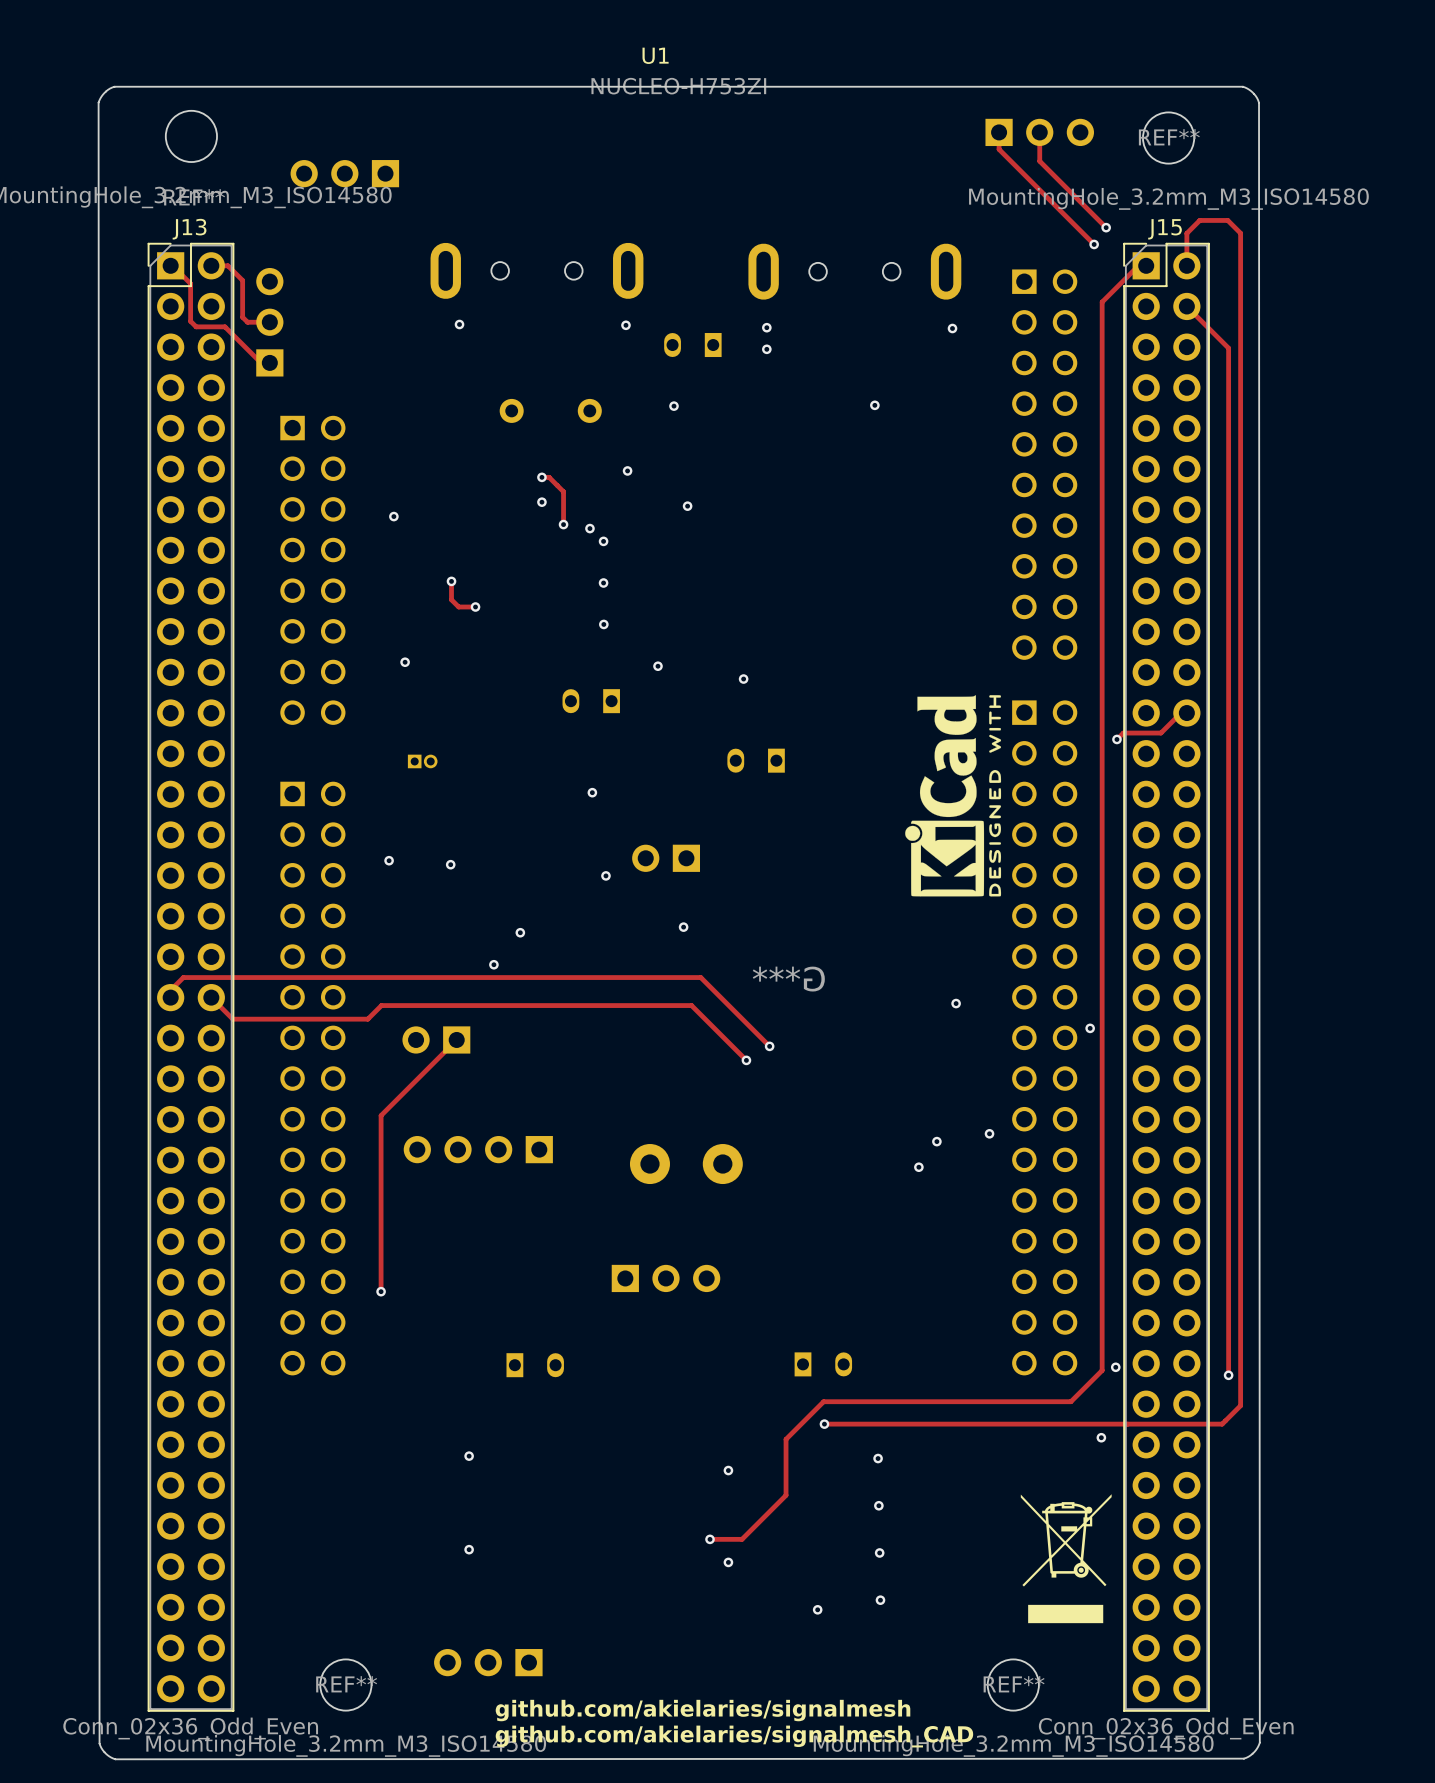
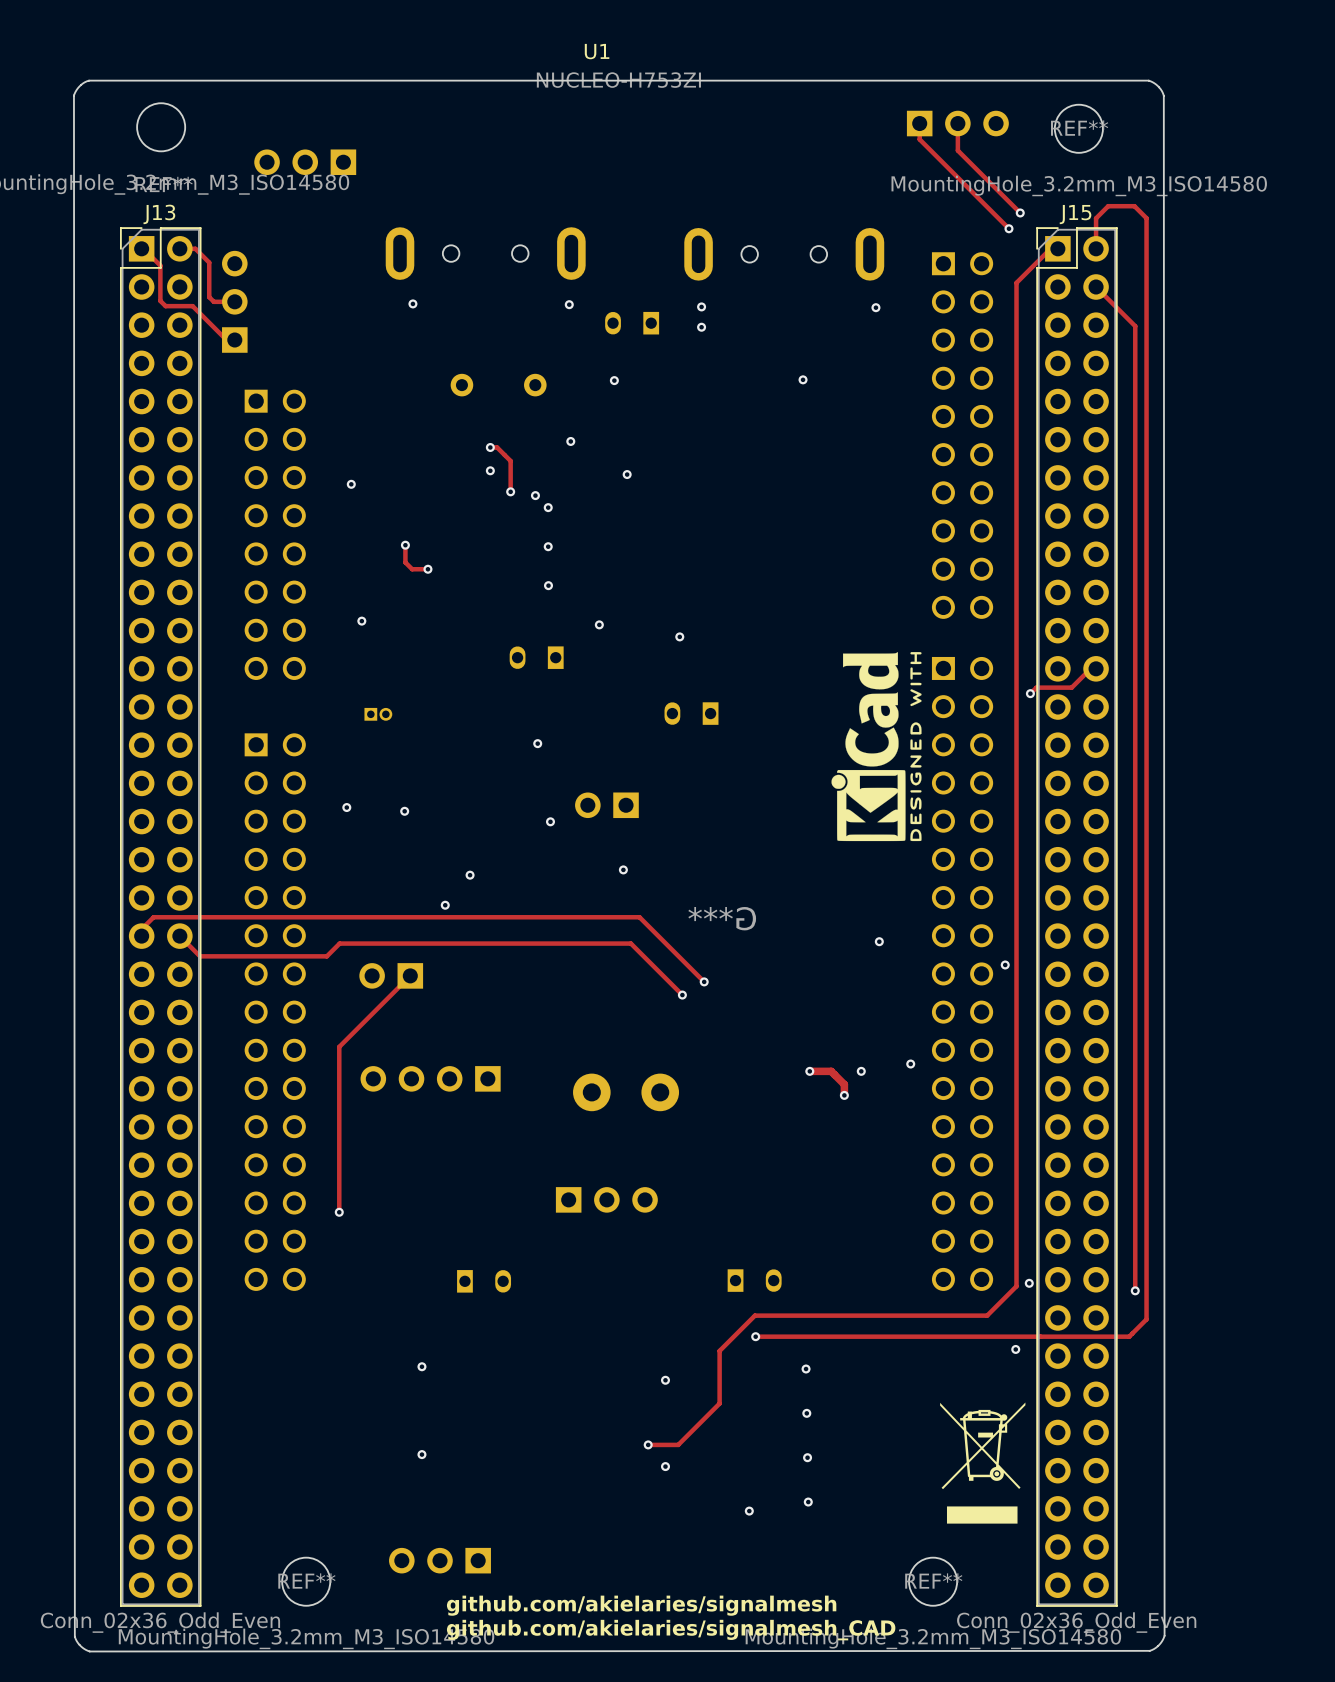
track: none -> (809, 1071) (831, 1071) (844, 1084) (844, 1095)
via: none -> (809, 1071)

